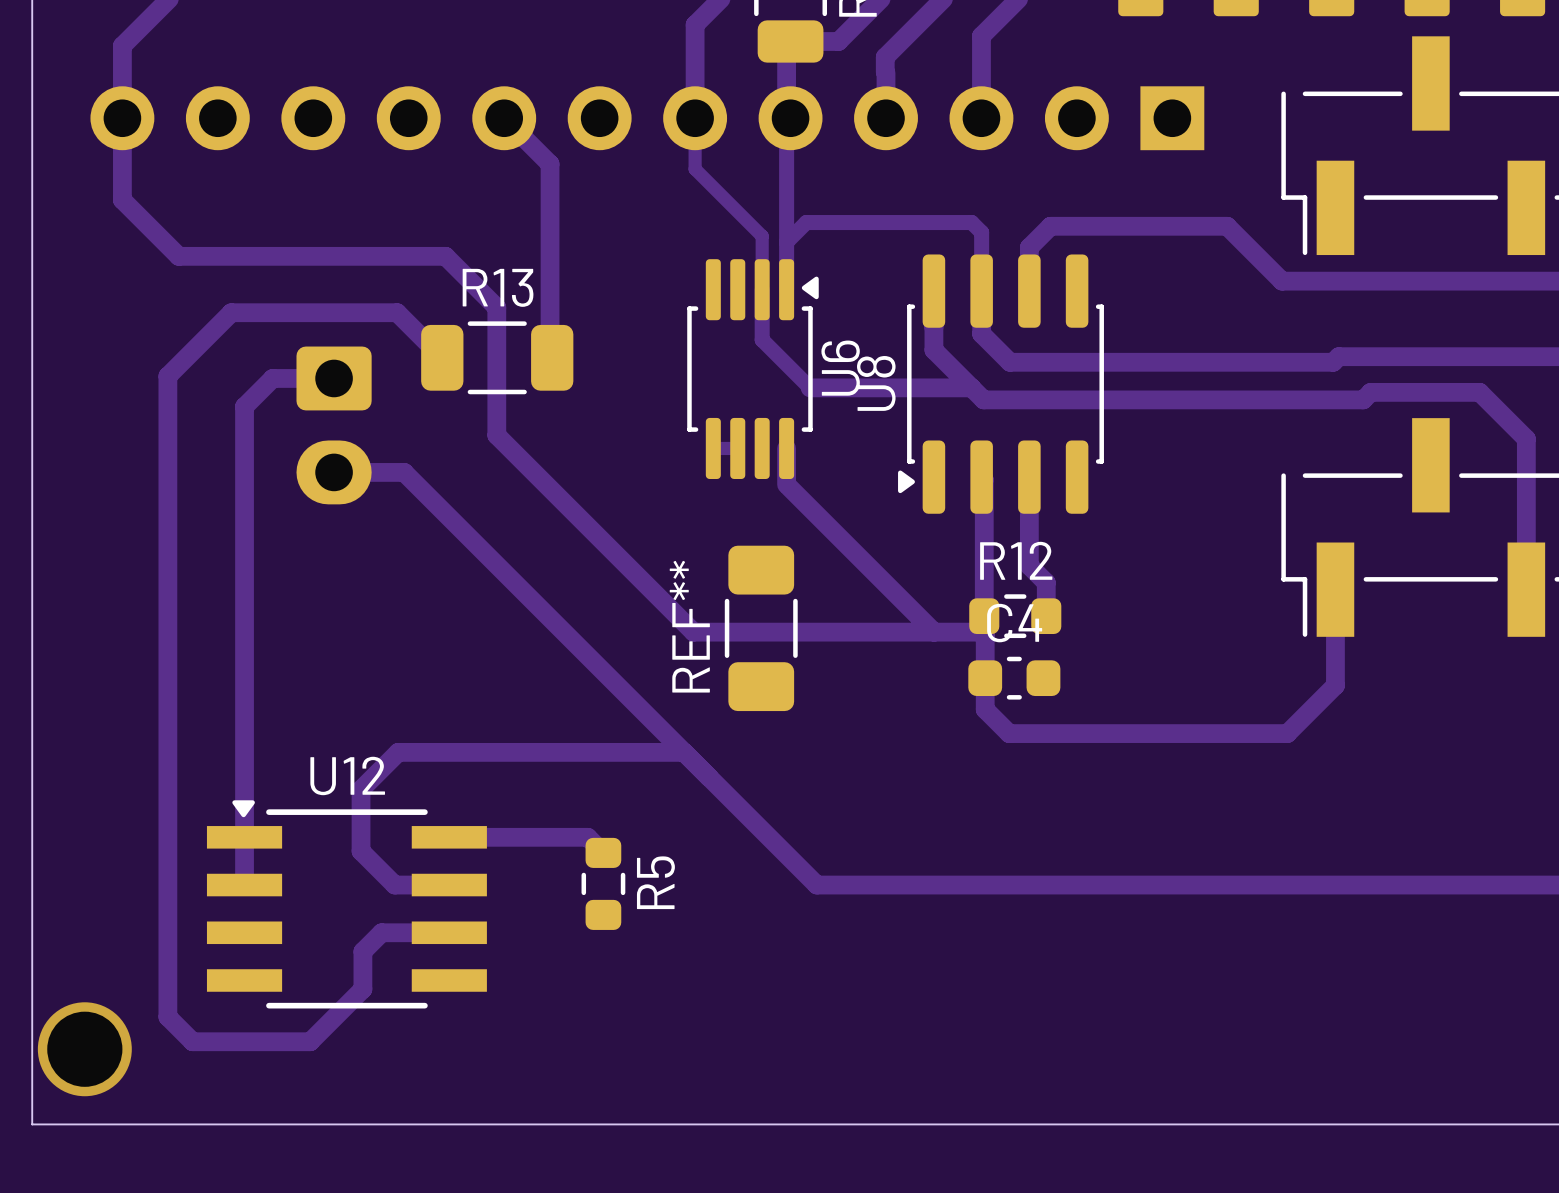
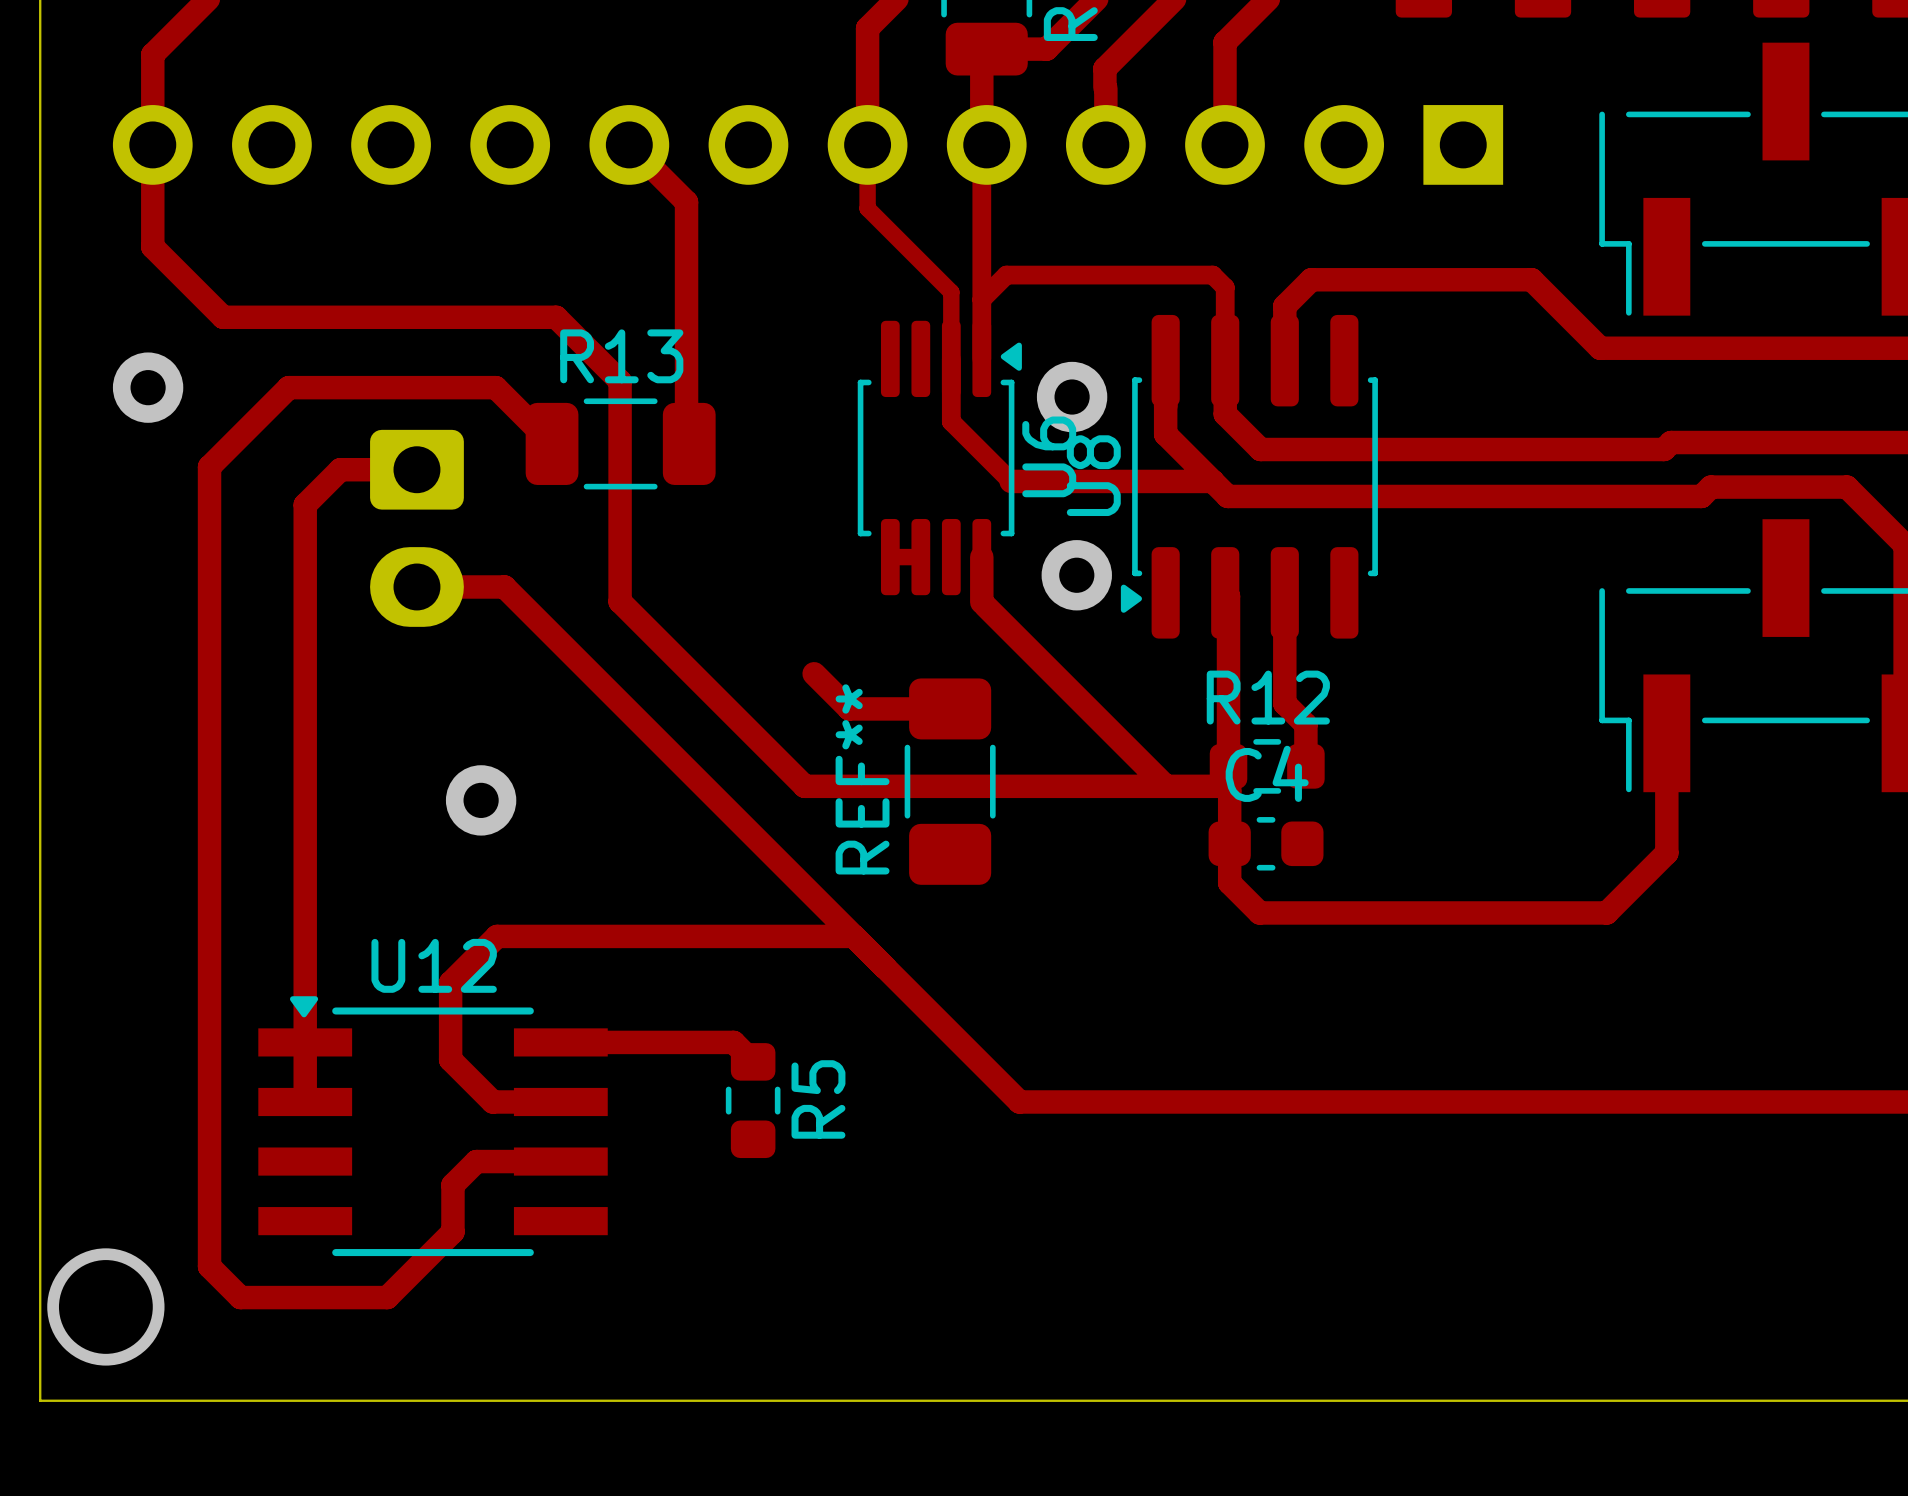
via: none -> (148, 387)
via: none -> (1072, 397)
track: (496, 435) (693, 632) -> (620, 540) (620, 601) (804, 786) (865, 786)
via: none -> (1076, 575)
track: none -> (814, 673) (849, 708) (950, 708)
via: none -> (481, 800)

